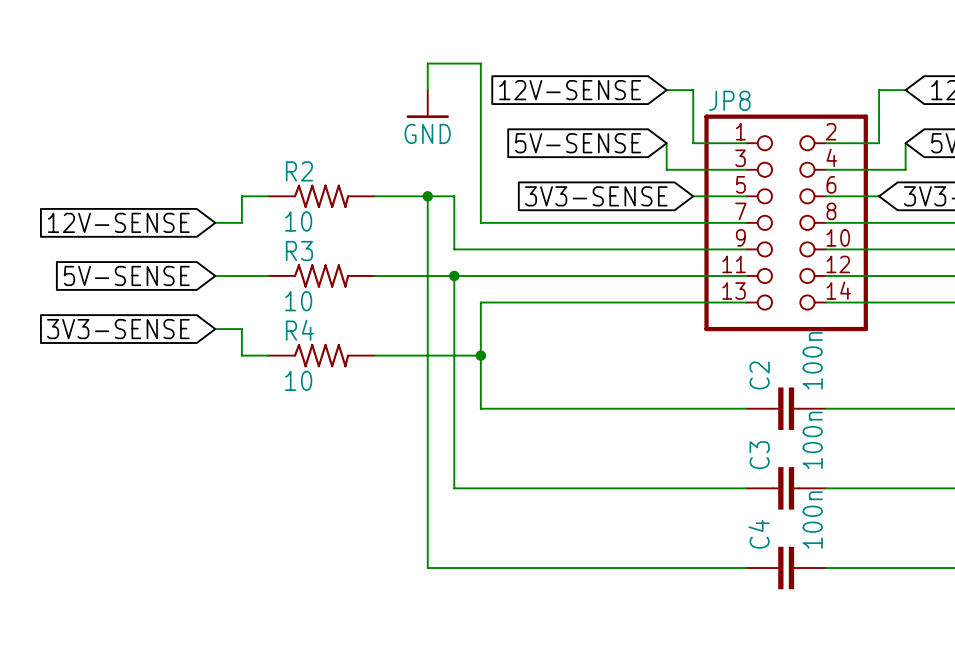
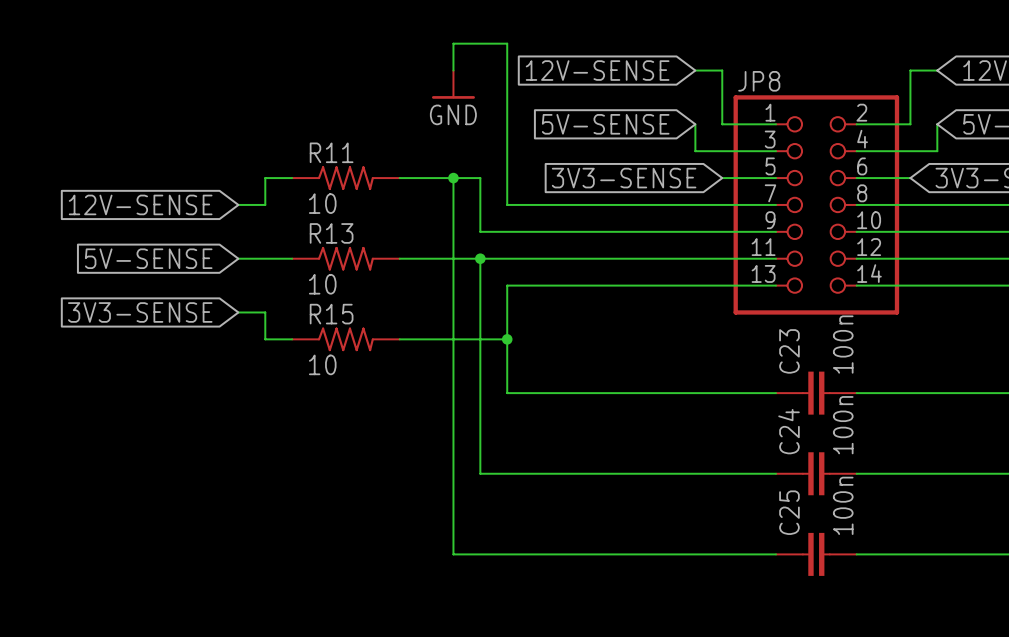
R2 name: R2 (299, 171) -> R11 (331, 152)
R3 name: R3 (299, 251) -> R13 (331, 233)
R4 name: R4 (299, 330) -> R15 (331, 314)
C2 name: C2 (759, 375) -> C23 (789, 351)
C3 name: C3 (759, 455) -> C24 (789, 431)
C4 name: C4 (759, 534) -> C25 (789, 512)

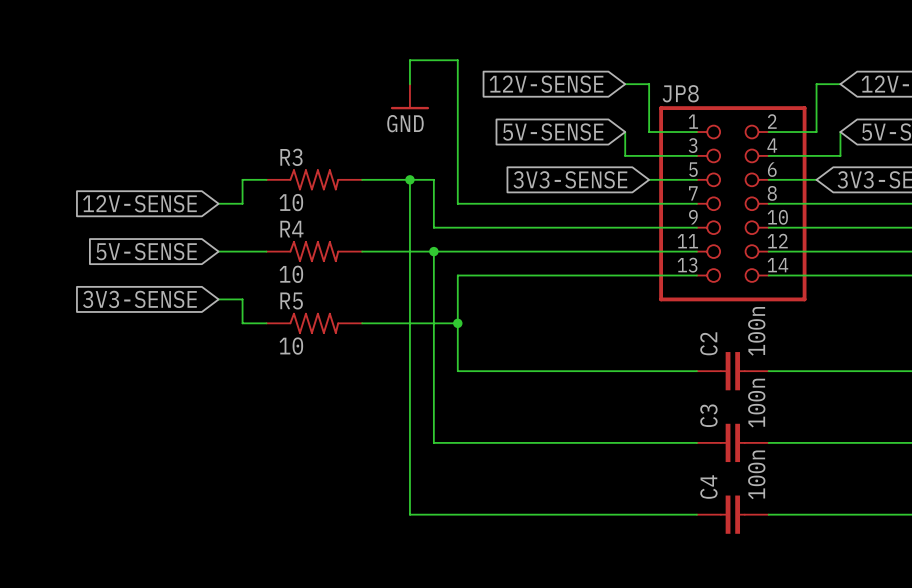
R11 name: R11 (331, 152) -> R3 (291, 157)
R13 name: R13 (331, 233) -> R4 (291, 229)
R15 name: R15 (331, 314) -> R5 (291, 301)
C23 name: C23 (789, 351) -> C2 (708, 343)
C24 name: C24 (789, 431) -> C3 (708, 415)
C25 name: C25 (789, 512) -> C4 (708, 487)

